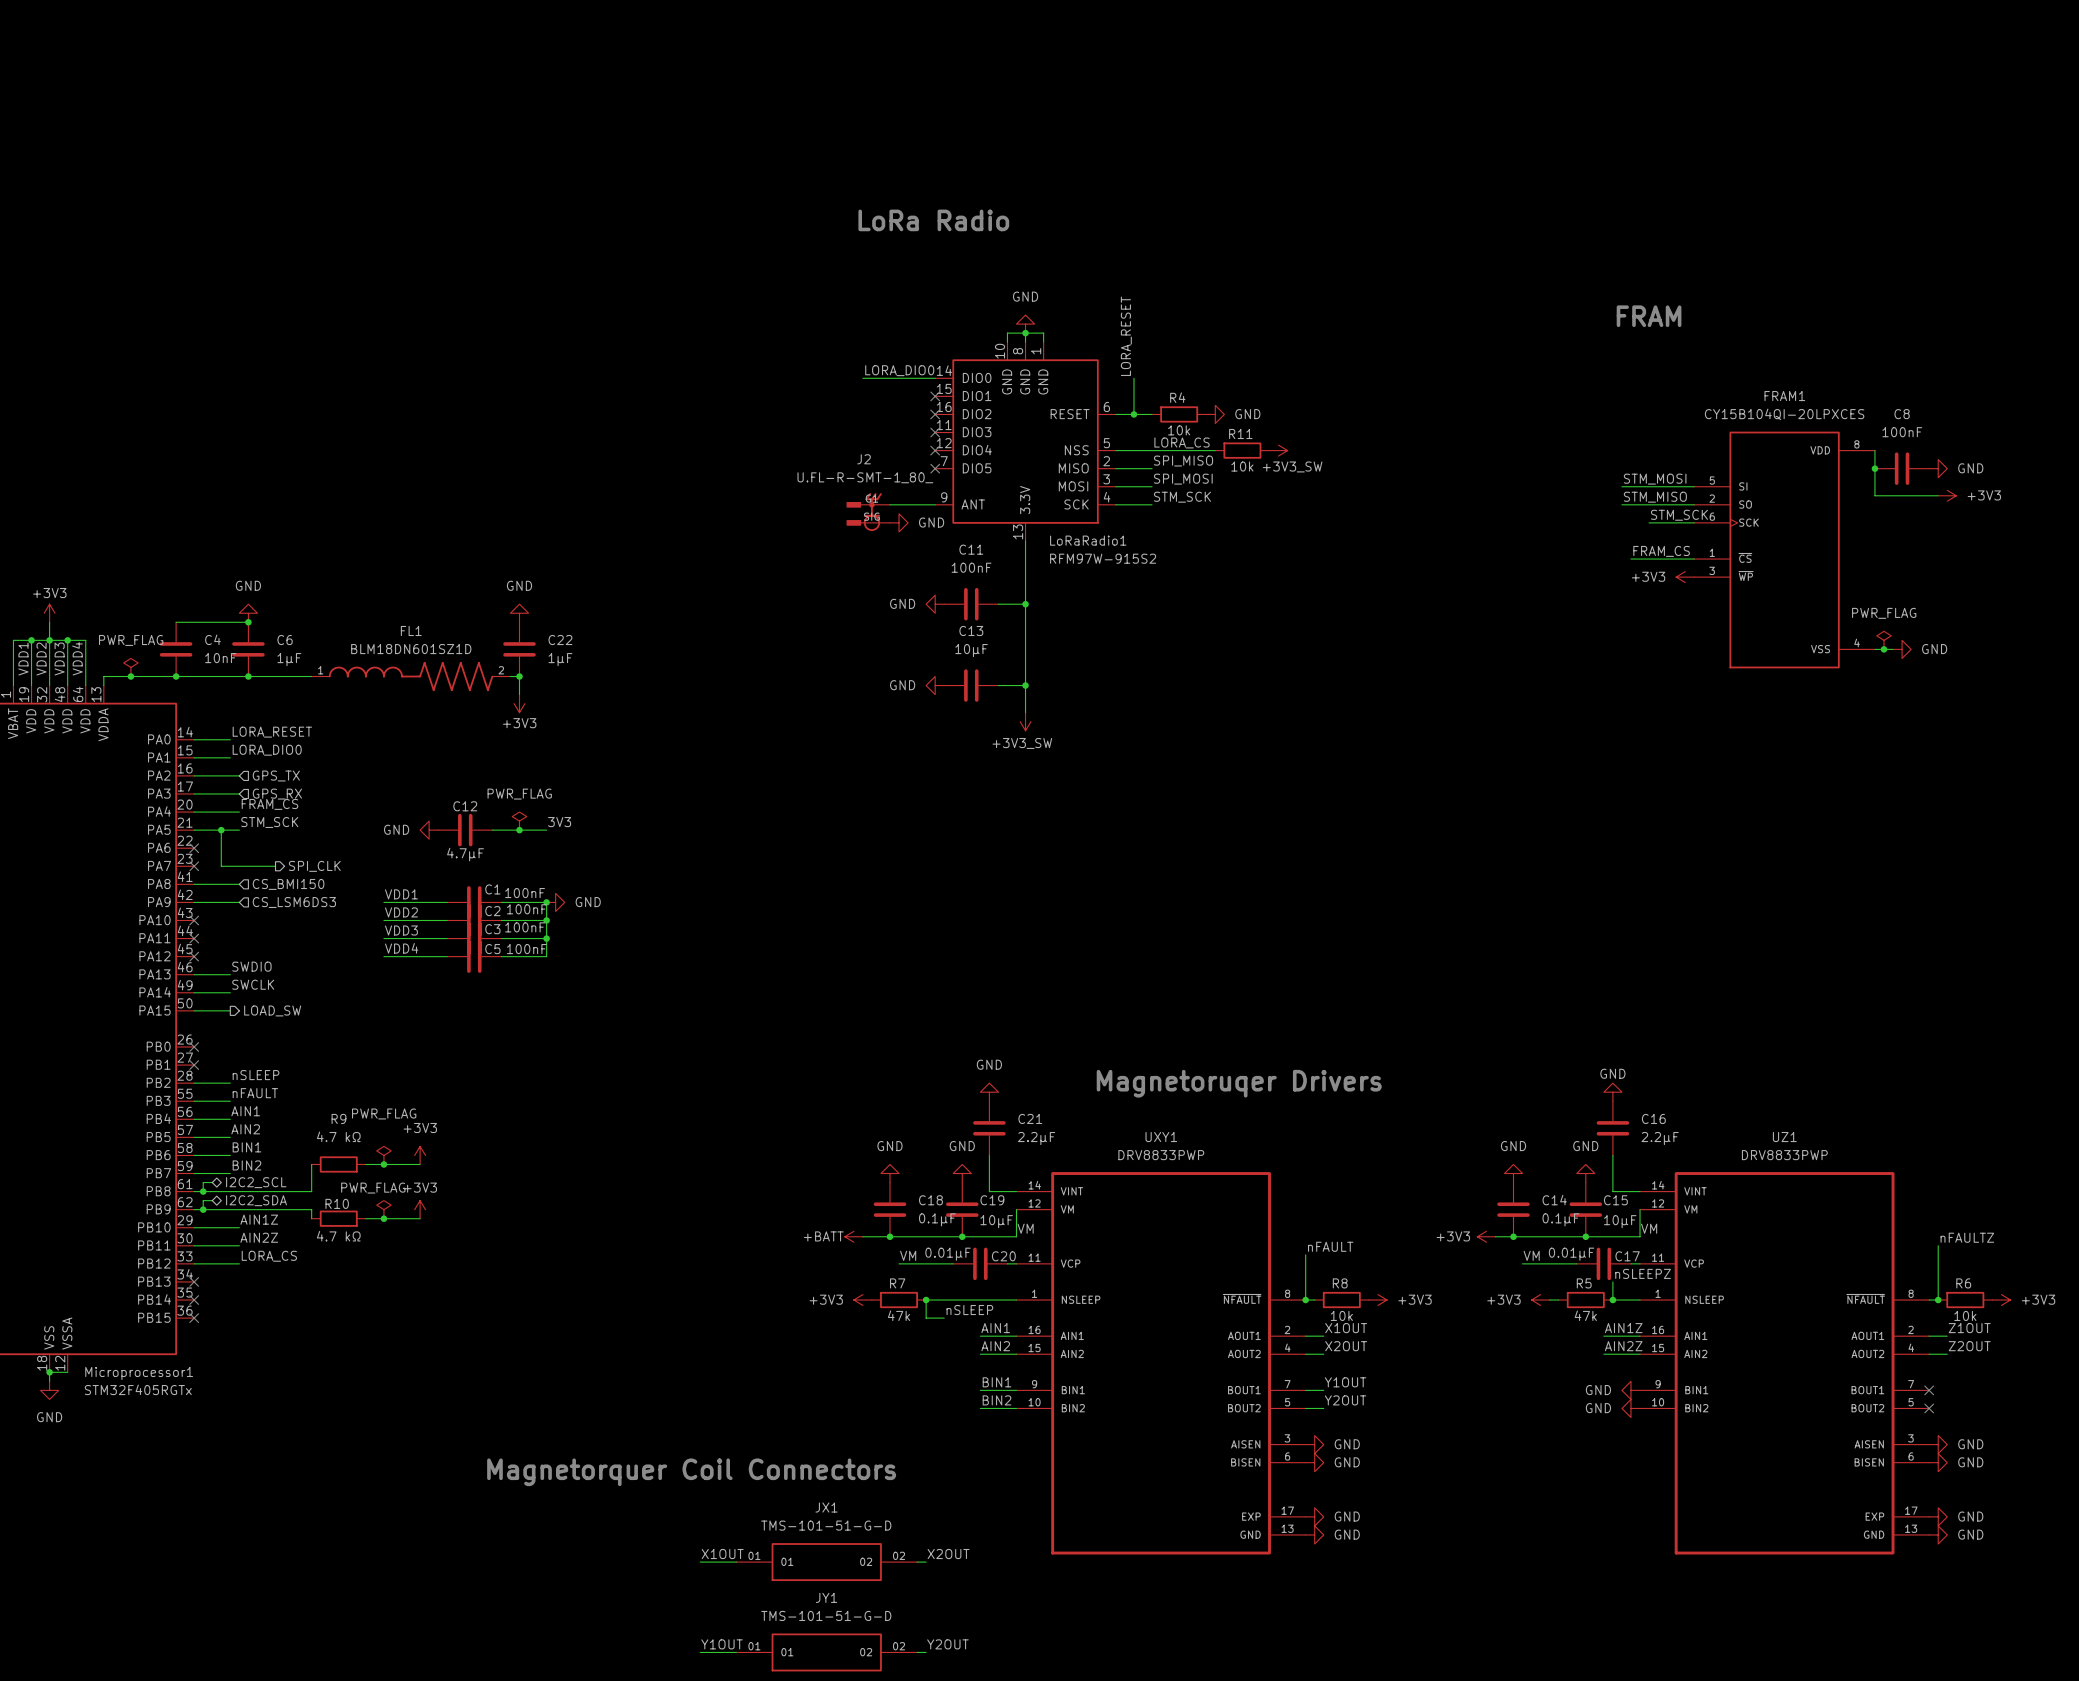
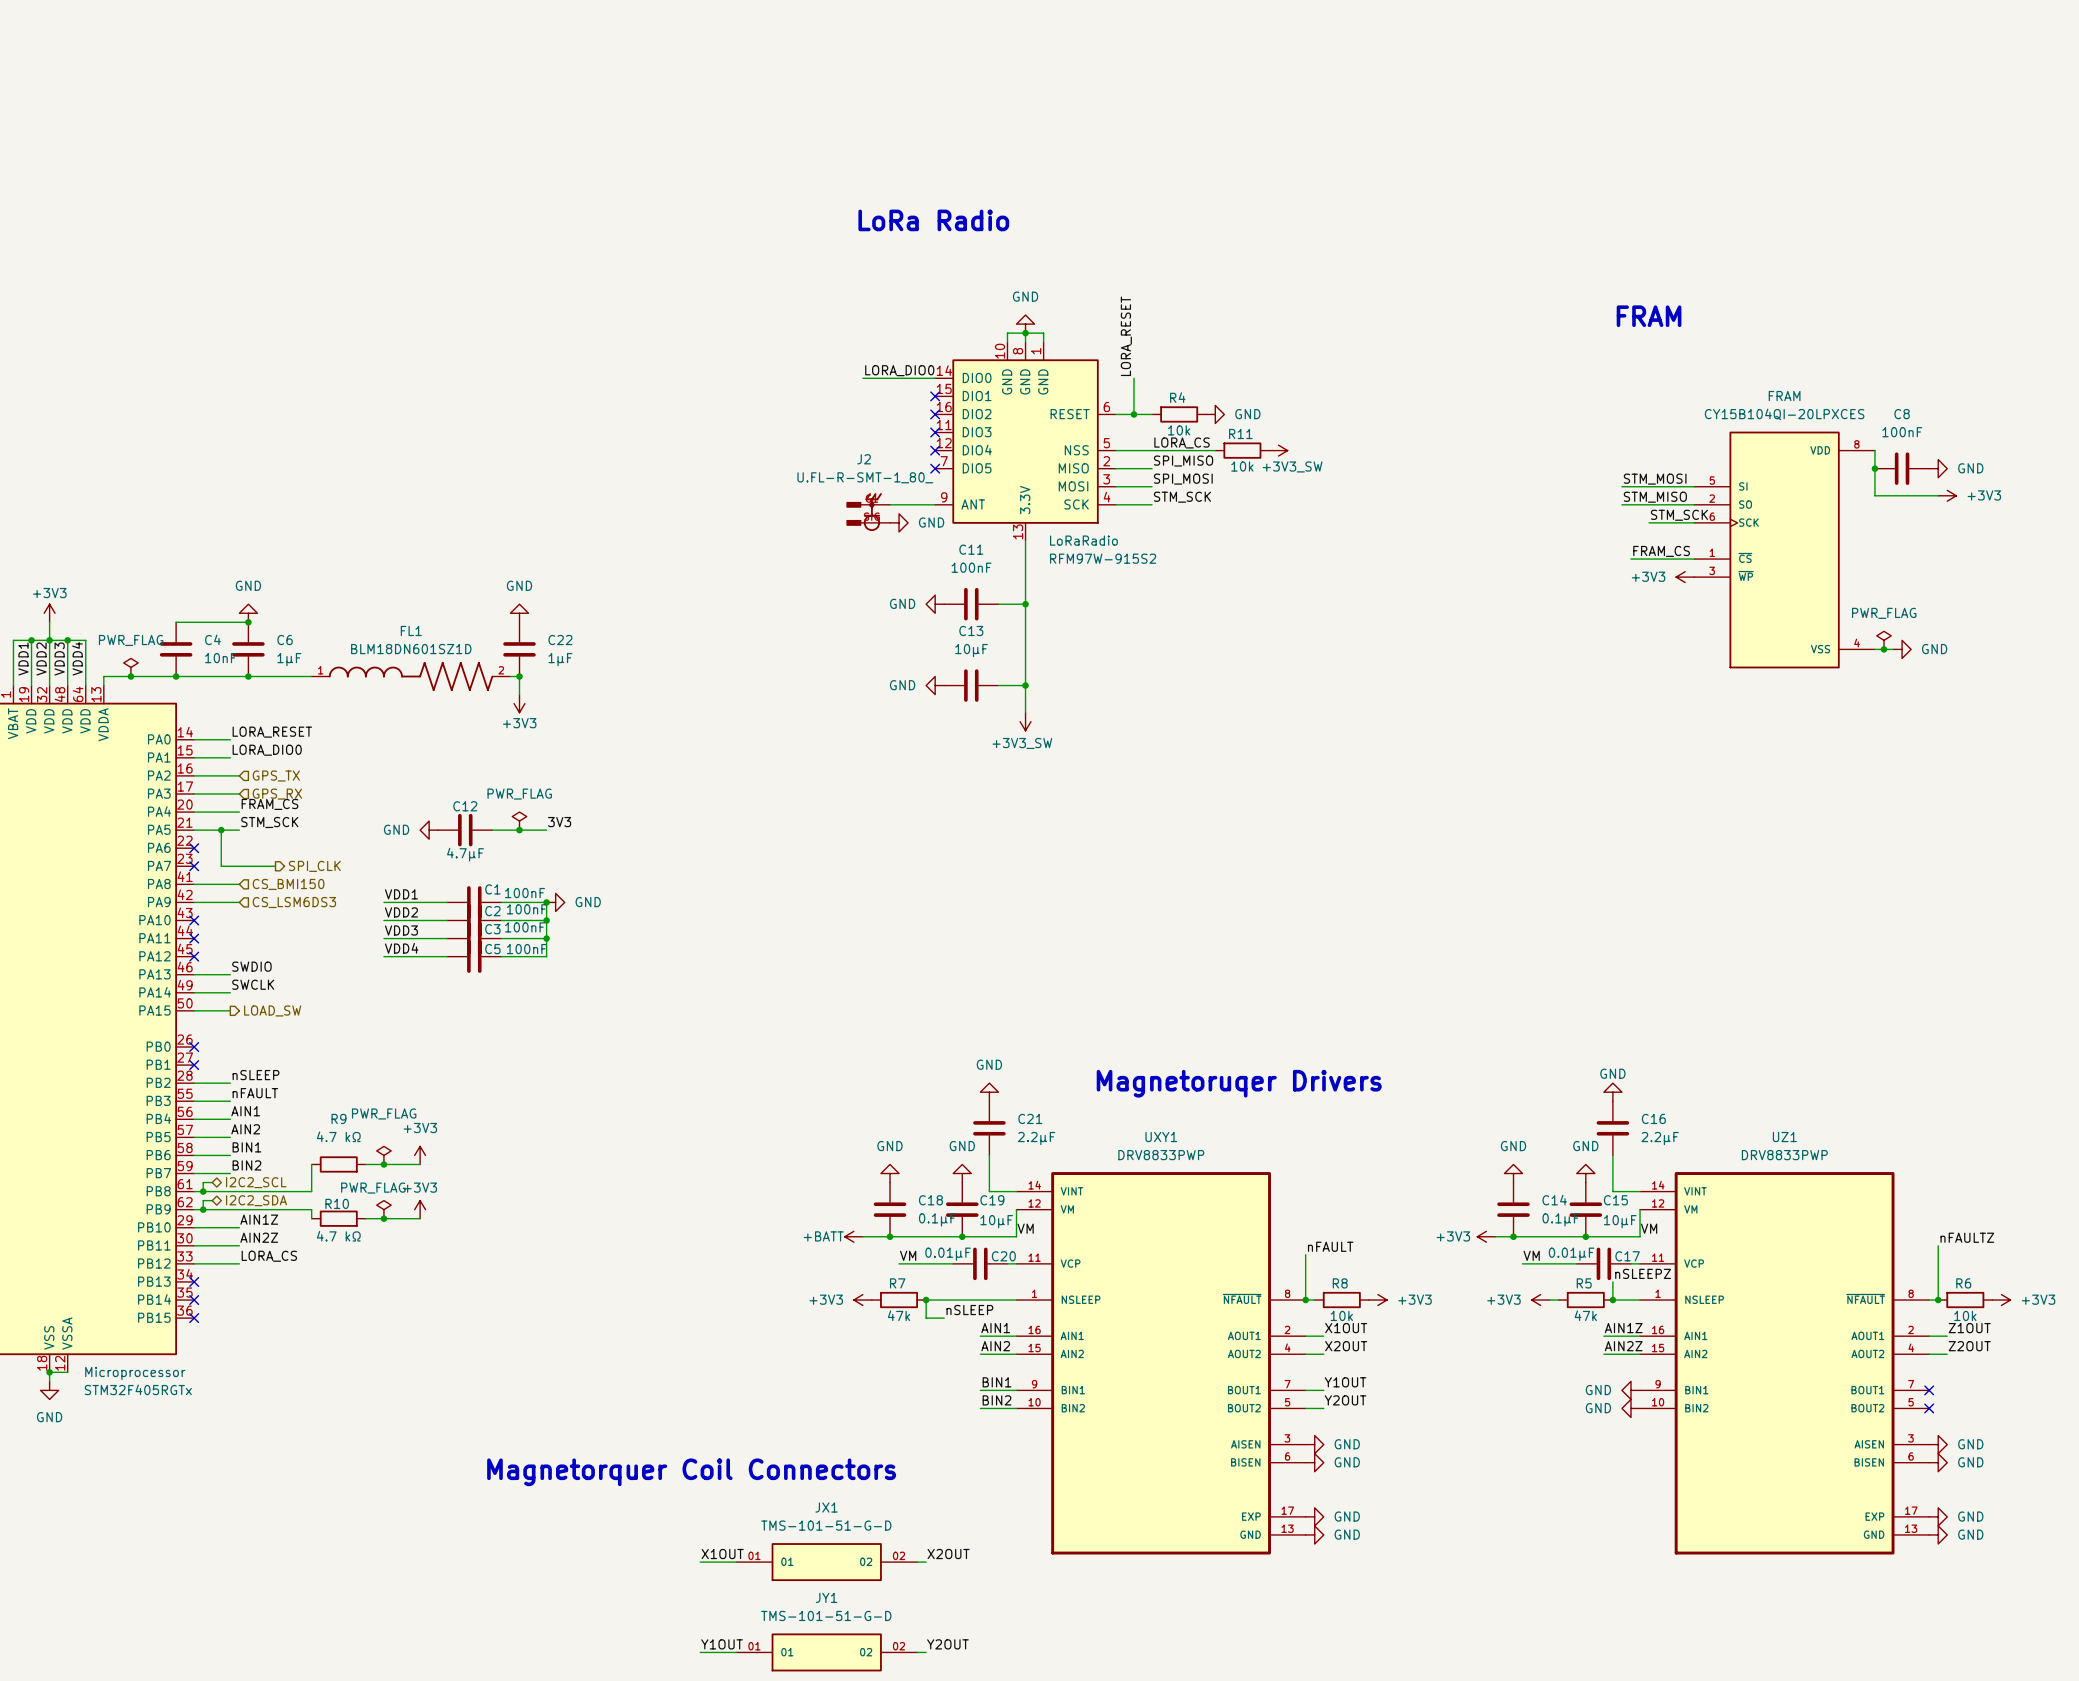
FRAM1 name: FRAM1 (1784, 396) -> FRAM (1784, 396)
LoRaRadio1 name: LoRaRadio1 (1088, 540) -> LoRaRadio (1083, 540)
Microprocessor1 name: Microprocessor1 (139, 1373) -> Microprocessor (135, 1373)

